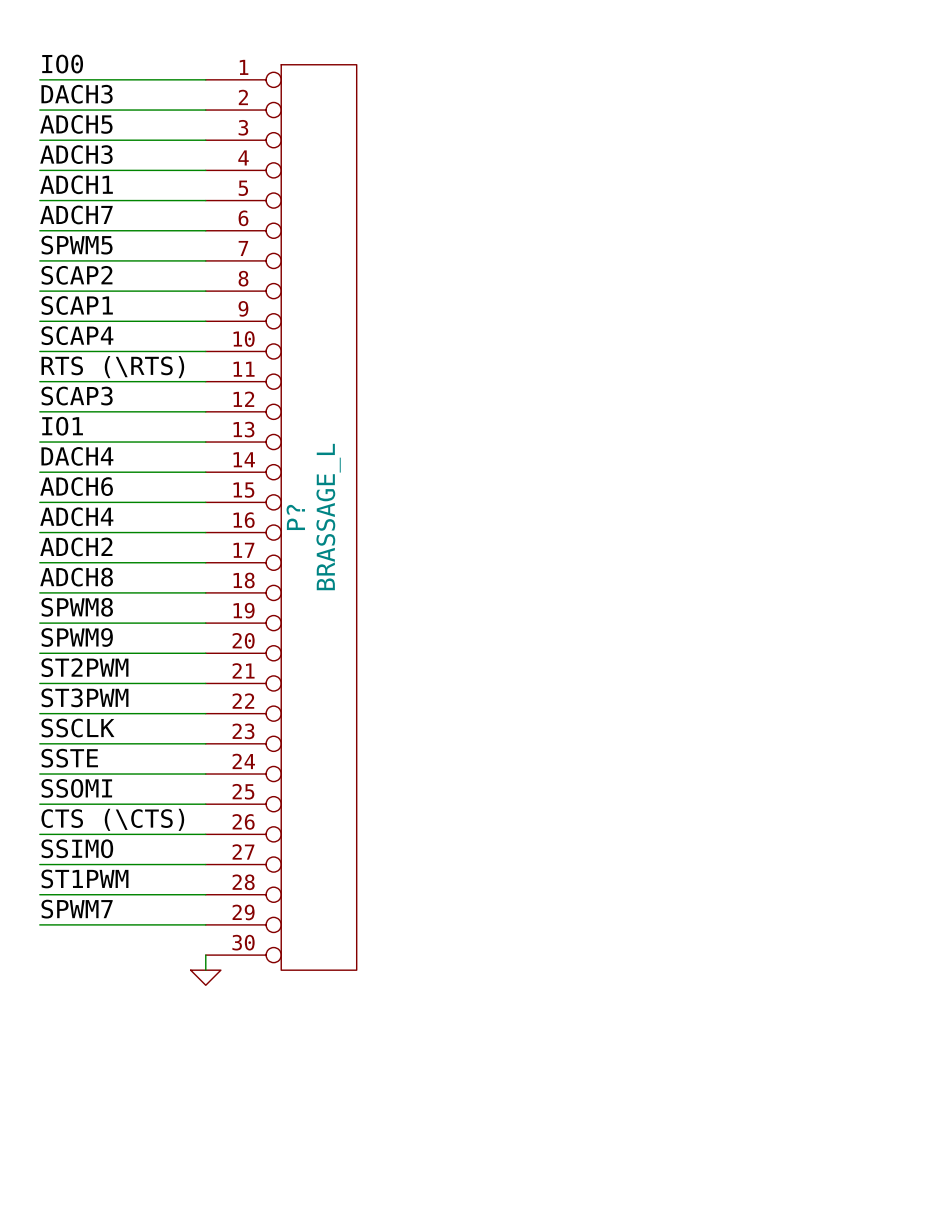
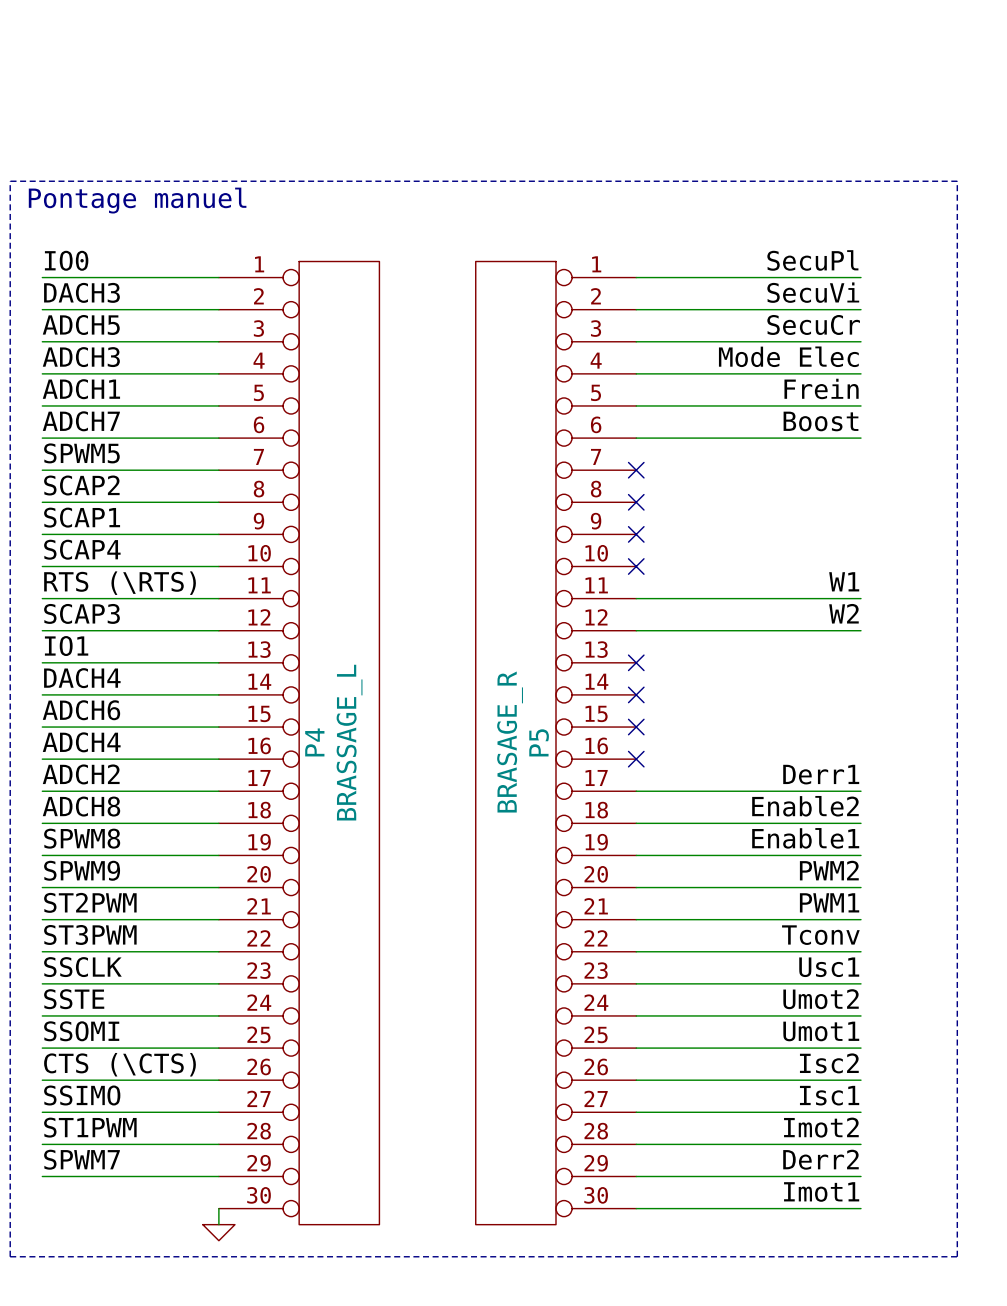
label: IO0 (62, 64) -> none
wire: (39, 79) (205, 79) -> none
label: DACH3 (77, 94) -> none
wire: (39, 110) (205, 110) -> none
label: ADCH5 (76, 124) -> none
wire: (39, 140) (205, 140) -> none
label: ADCH3 (76, 154) -> none
line: none -> (10, 181) (10, 1256) (957, 1256) (957, 181) (10, 181)
label: ADCH1 (76, 184) -> none
text: none -> Pontage manuel (137, 200)
wire: (39, 200) (205, 200) -> none
label: ADCH7 (76, 214) -> none
wire: (39, 230) (205, 230) -> none
label: none -> SecuPl (812, 260)
label: SPWM5 (77, 245) -> IO0 (66, 260)
wire: none -> (636, 277) (860, 277)
label: SCAP2 (76, 275) -> DACH3 (81, 292)
label: none -> SecuVi (813, 292)
wire: none -> (636, 309) (860, 309)
label: SCAP1 (77, 305) -> ADCH5 (81, 324)
label: none -> SecuCr (813, 324)
wire: none -> (636, 341) (860, 341)
label: SCAP4 (77, 335) -> ADCH3 (81, 357)
label: none -> Mode Elec (788, 356)
wire: none -> (636, 373) (860, 373)
label: none -> Frein (821, 388)
label: RTS (\RTS) (112, 367) -> ADCH1 (81, 389)
wire: none -> (636, 405) (860, 405)
label: SCAP3 (77, 396) -> ADCH7 (81, 421)
label: none -> Boost (821, 421)
wire: none -> (636, 438) (860, 438)
label: IO1 (62, 426) -> SPWM5 (81, 453)
no-connect mark: none -> (636, 470)
label: DACH4 (77, 456) -> SCAP2 (81, 485)
no-connect mark: none -> (636, 502)
label: ADCH6 (76, 486) -> SCAP1 (82, 517)
no-connect mark: none -> (636, 534)
label: ADCH4 (76, 516) -> SCAP4 (82, 549)
P?: BRASSAGE_L (281, 517) -> none
no-connect mark: none -> (636, 566)
label: ADCH2 (76, 546) -> RTS (\RTS) (120, 583)
label: none -> W1 (844, 581)
wire: none -> (636, 598) (860, 598)
label: none -> W2 (843, 613)
label: ADCH8 (76, 577) -> SCAP3 (81, 613)
wire: none -> (636, 630) (860, 630)
label: SPWM8 (77, 607) -> IO1 (66, 646)
no-connect mark: none -> (636, 662)
label: SPWM9 (77, 637) -> DACH4 (82, 678)
no-connect mark: none -> (636, 694)
label: ST2PWM (84, 667) -> ADCH6 (81, 710)
no-connect mark: none -> (636, 727)
label: ST3PWM (84, 697) -> ADCH4 (81, 742)
P4: none -> BRASSAGE_L (299, 743)
P5: none -> BRASAGE_R (555, 743)
no-connect mark: none -> (636, 759)
label: SSCLK (77, 728) -> ADCH2 (81, 774)
label: none -> Derr1 (821, 774)
wire: none -> (636, 791) (860, 791)
label: none -> Enable2 (805, 806)
label: SSTE (69, 758) -> ADCH8 (81, 806)
wire: none -> (636, 823) (860, 823)
label: SSOMI (76, 788) -> SPWM8 (82, 838)
label: none -> Enable1 (805, 838)
wire: none -> (636, 855) (860, 855)
label: none -> PWM2 (829, 870)
label: CTS (\CTS) (112, 819) -> SPWM9 (82, 870)
wire: none -> (636, 887) (860, 887)
label: SSIMO (77, 848) -> ST2PWM (90, 902)
label: none -> PWM1 (829, 902)
wire: none -> (636, 919) (860, 919)
label: ST1PWM (84, 878) -> ST3PWM (90, 934)
label: none -> Tconv (820, 935)
wire: none -> (636, 951) (860, 951)
label: SPWM7 (77, 909) -> SSCLK (82, 967)
label: none -> Usc1 (829, 967)
wire: none -> (636, 983) (860, 983)
label: none -> SSTE (74, 999)
label: none -> Umot2 (821, 999)
wire: (205, 955) (205, 970) -> (218, 1015) (42, 1015)
wire: none -> (636, 1015) (860, 1015)
label: none -> SSOMI (81, 1031)
label: none -> Umot1 (821, 1031)
power symbol position: (205, 977) -> (218, 1232)
wire: none -> (42, 1048) (218, 1048)
wire: none -> (636, 1048) (860, 1048)
label: none -> Isc2 (829, 1063)
label: none -> CTS (\CTS) (120, 1064)
wire: none -> (42, 1080) (218, 1080)
wire: none -> (636, 1080) (860, 1080)
label: none -> SSIMO (82, 1095)
label: none -> Isc1 (829, 1095)
wire: none -> (42, 1112) (218, 1112)
wire: none -> (636, 1112) (860, 1112)
label: none -> ST1PWM (90, 1127)
label: none -> Imot2 (821, 1127)
wire: none -> (42, 1144) (218, 1144)
wire: none -> (636, 1144) (860, 1144)
label: none -> SPWM7 (81, 1159)
label: none -> Derr2 (820, 1159)
wire: none -> (42, 1176) (218, 1176)
wire: none -> (636, 1176) (860, 1176)
label: none -> Imot1 (821, 1191)
wire: none -> (218, 1208) (218, 1224)
wire: none -> (636, 1208) (860, 1208)

